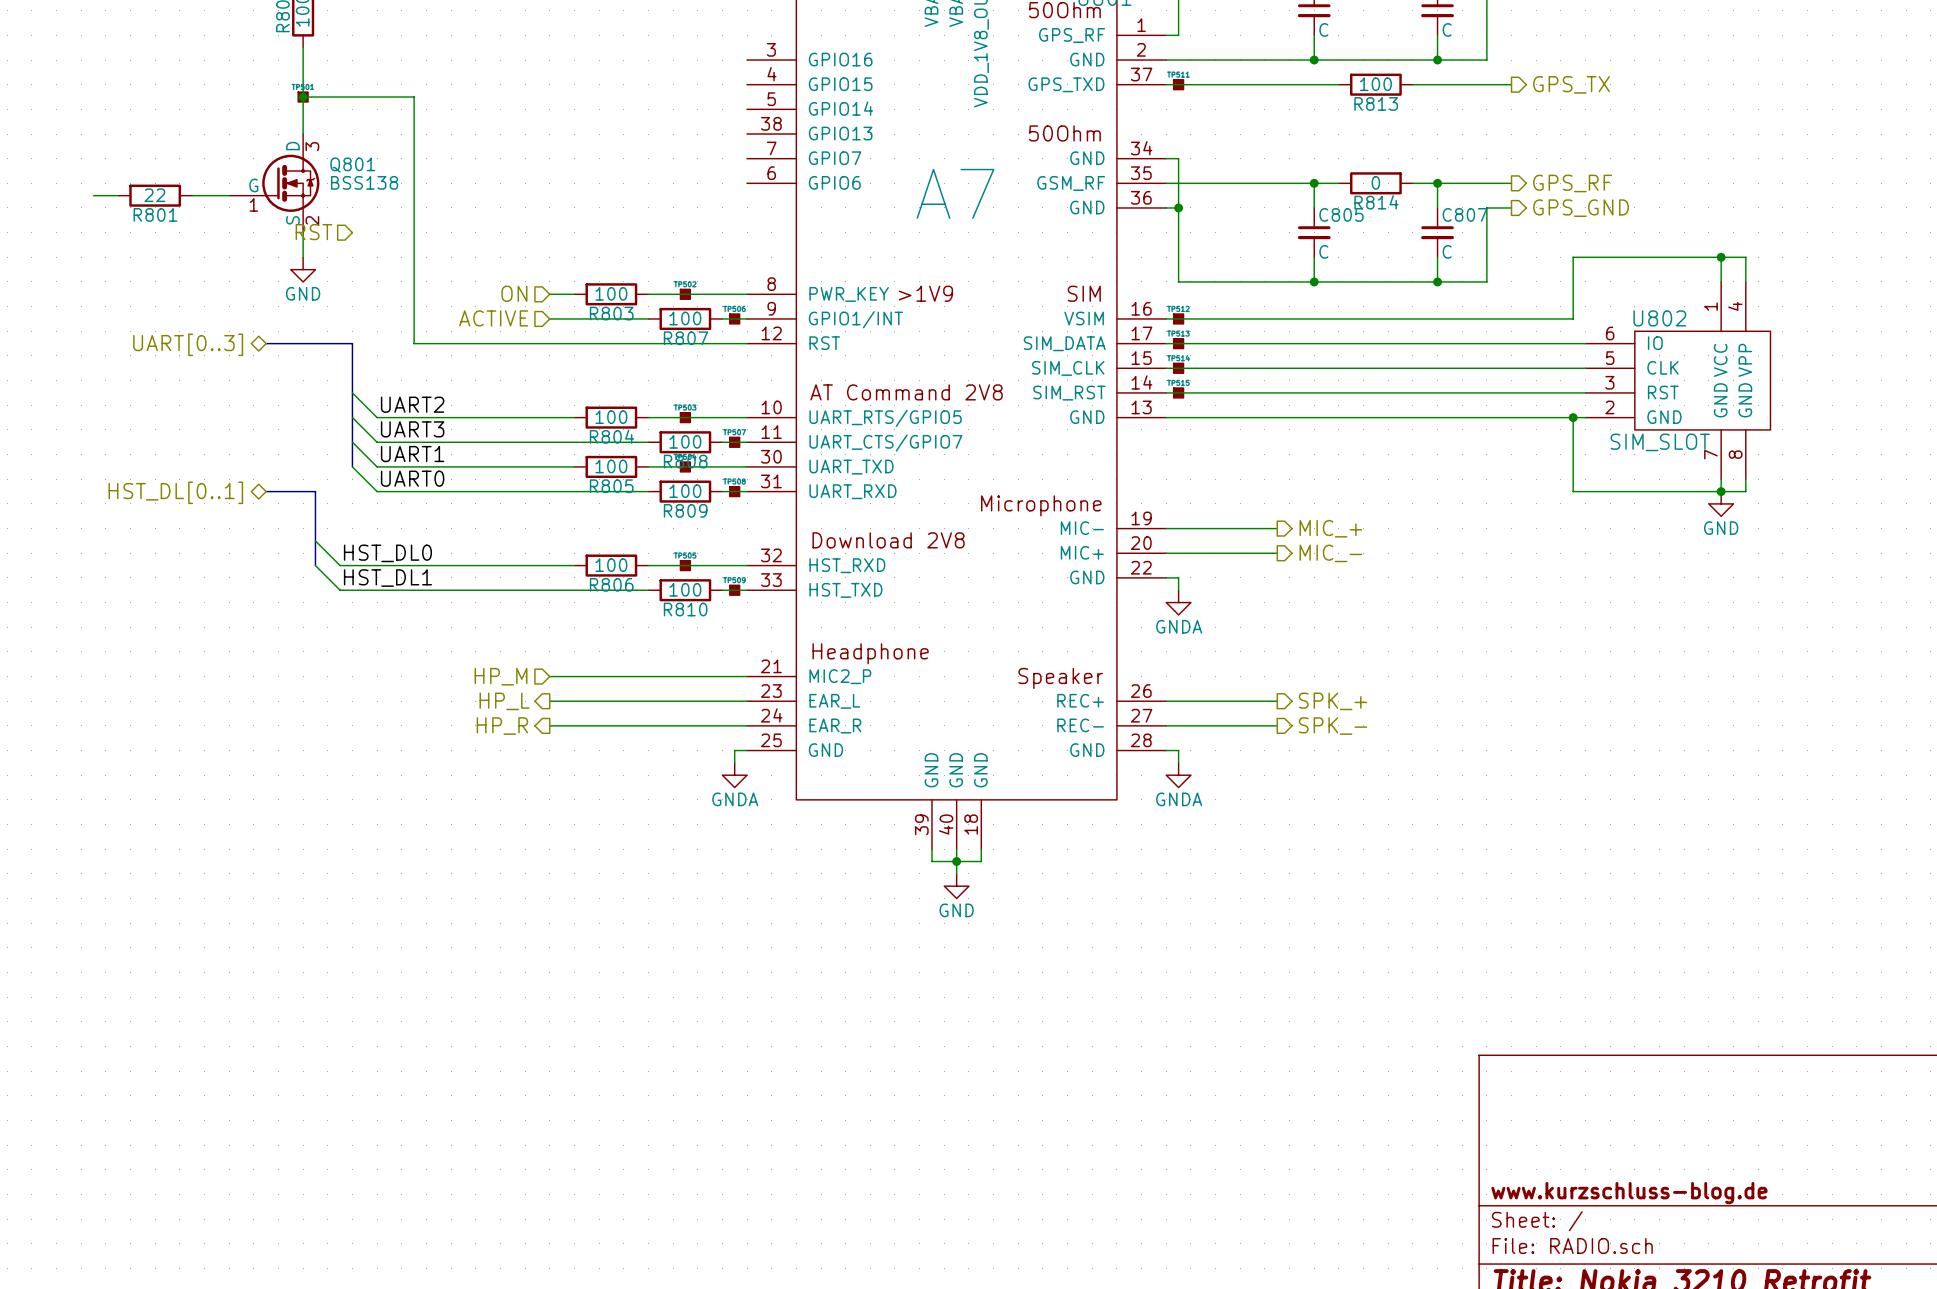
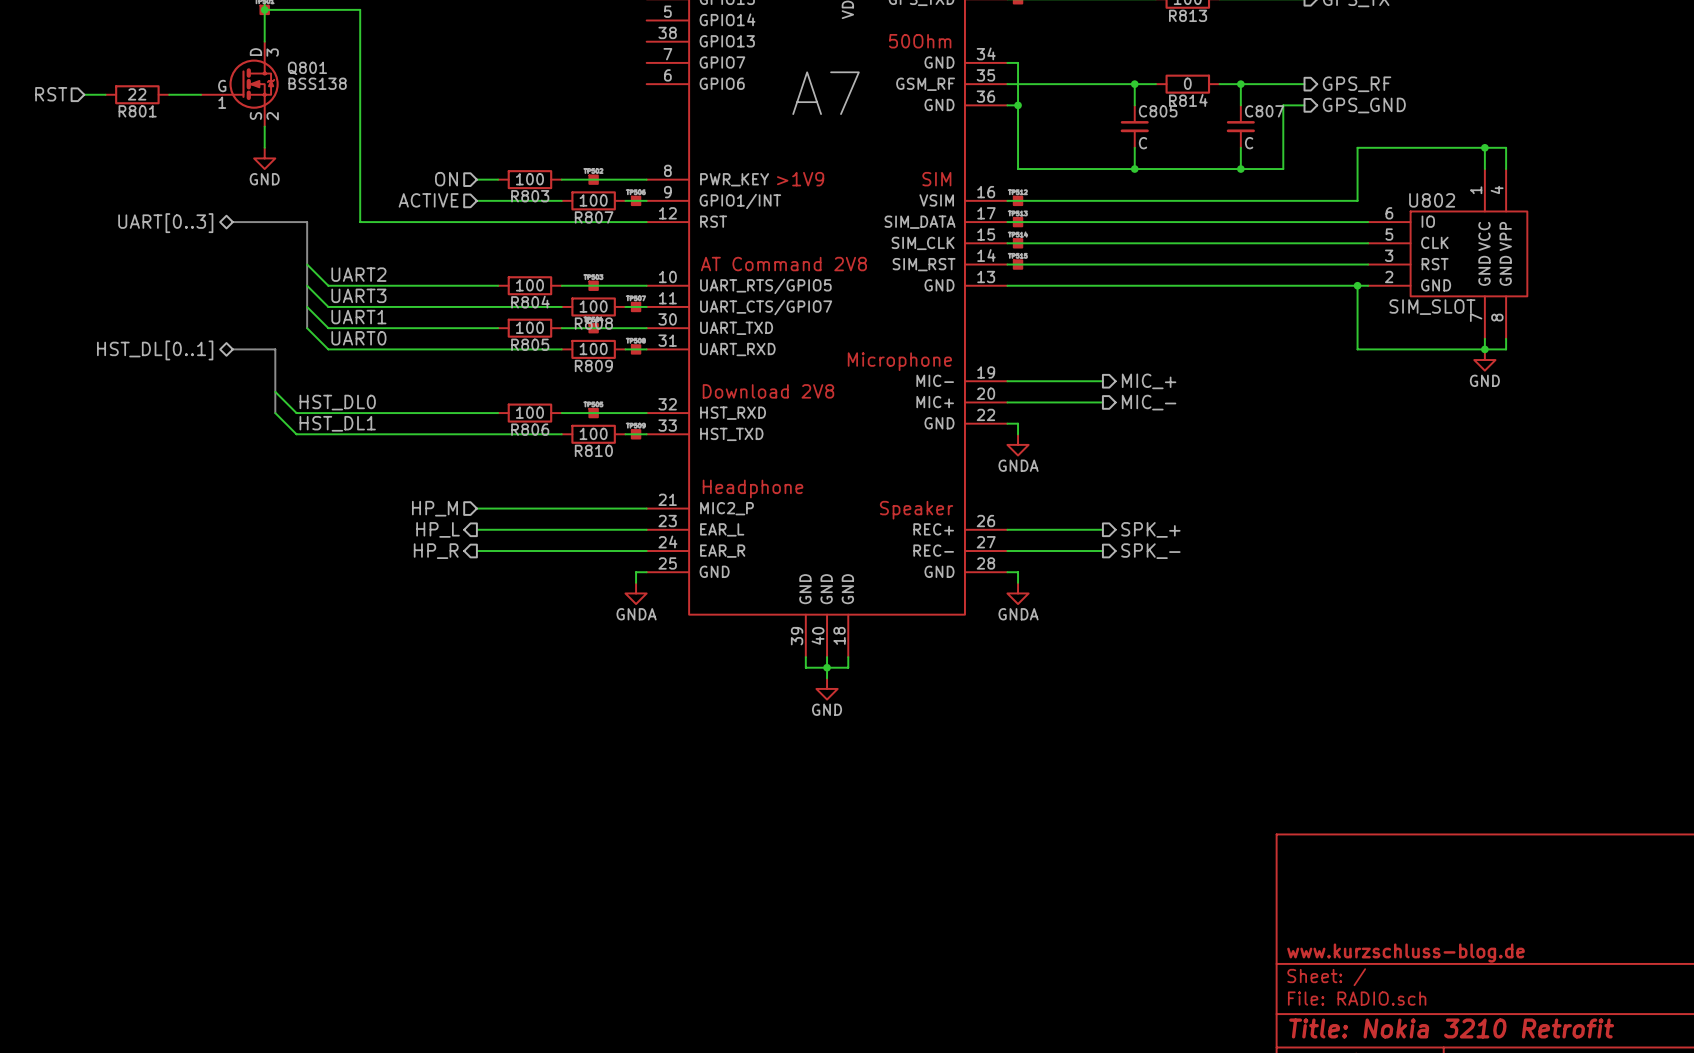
hierarchical label: none -> RST (51, 94)
hierarchical label: RST (313, 232) -> none

